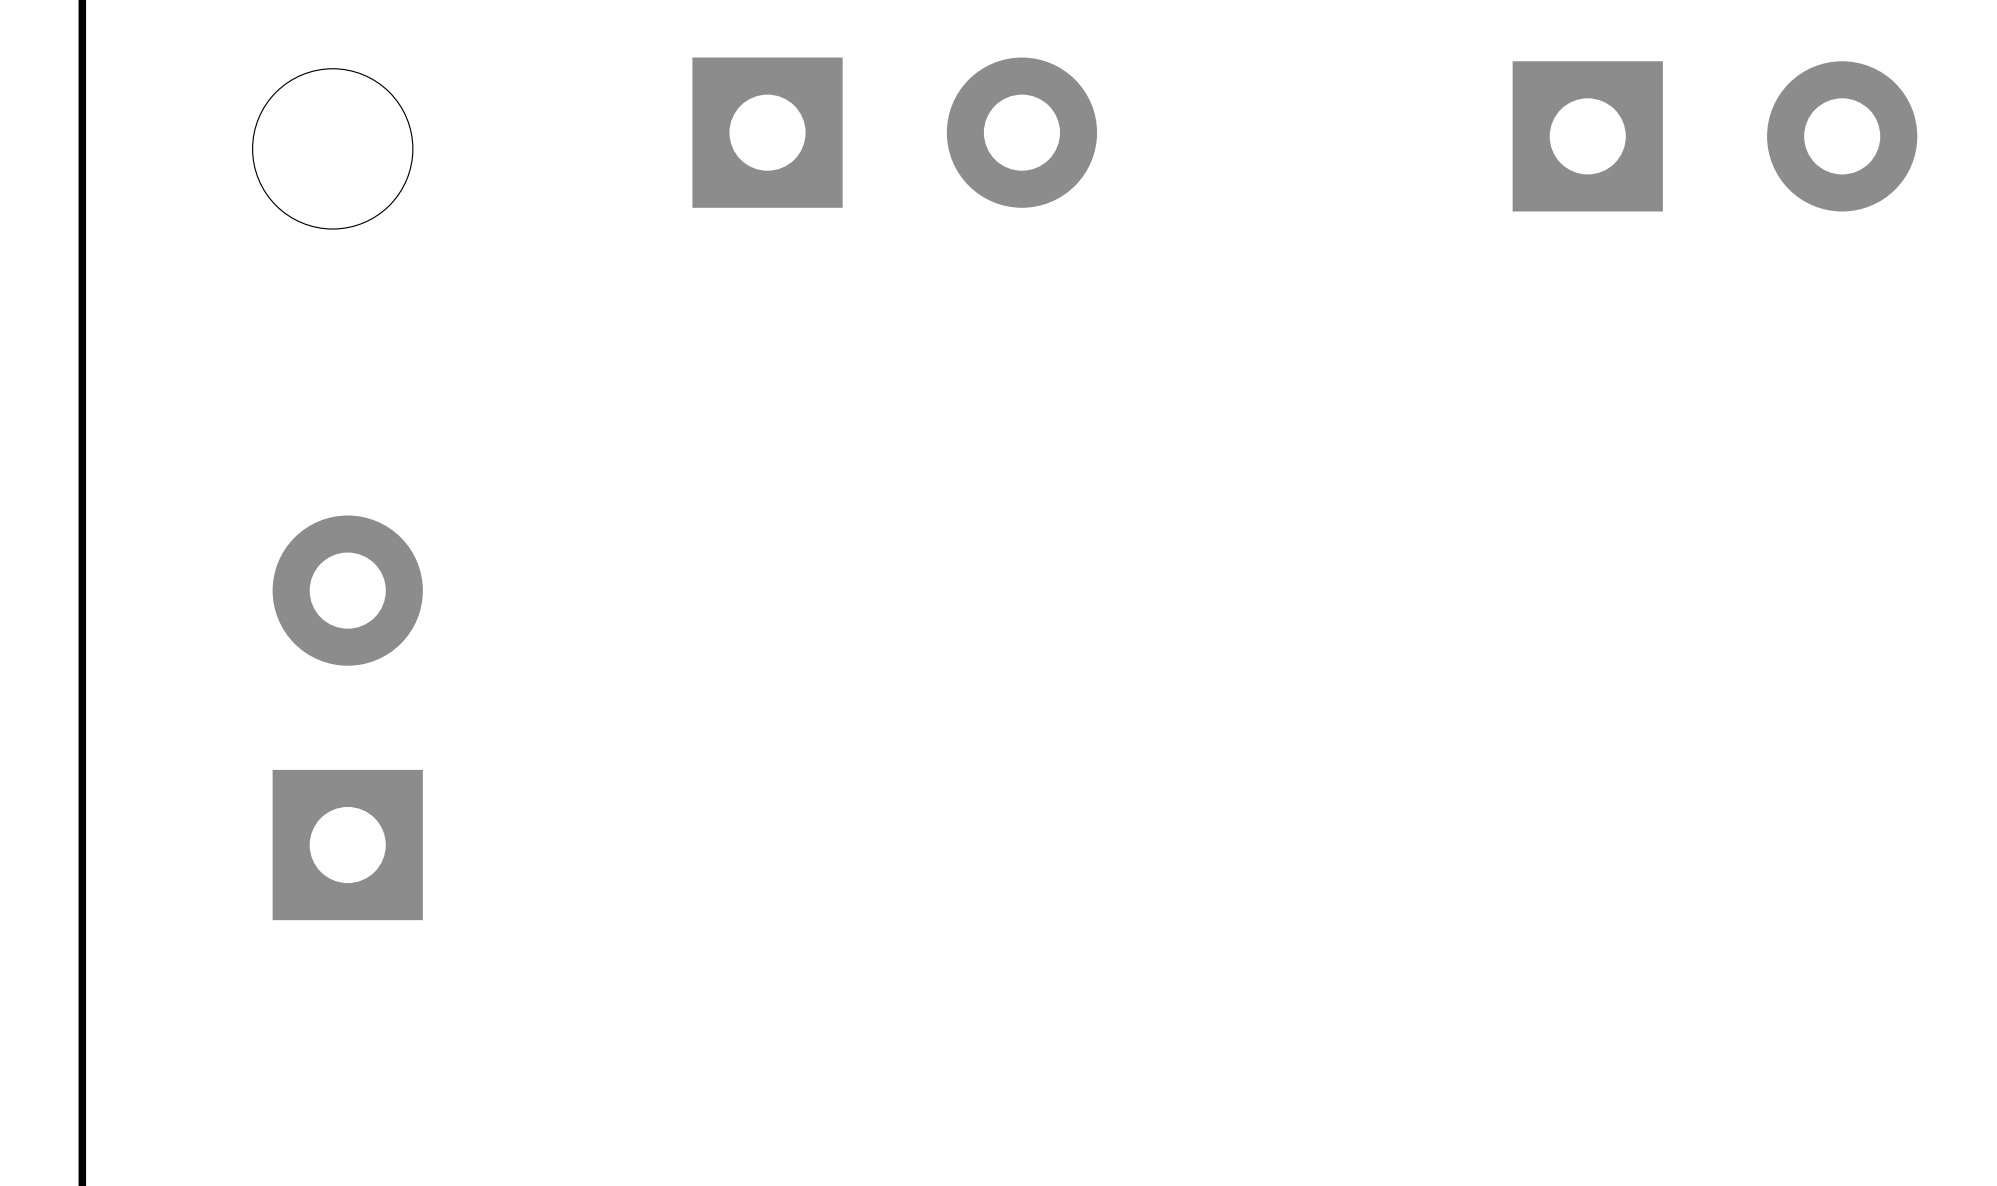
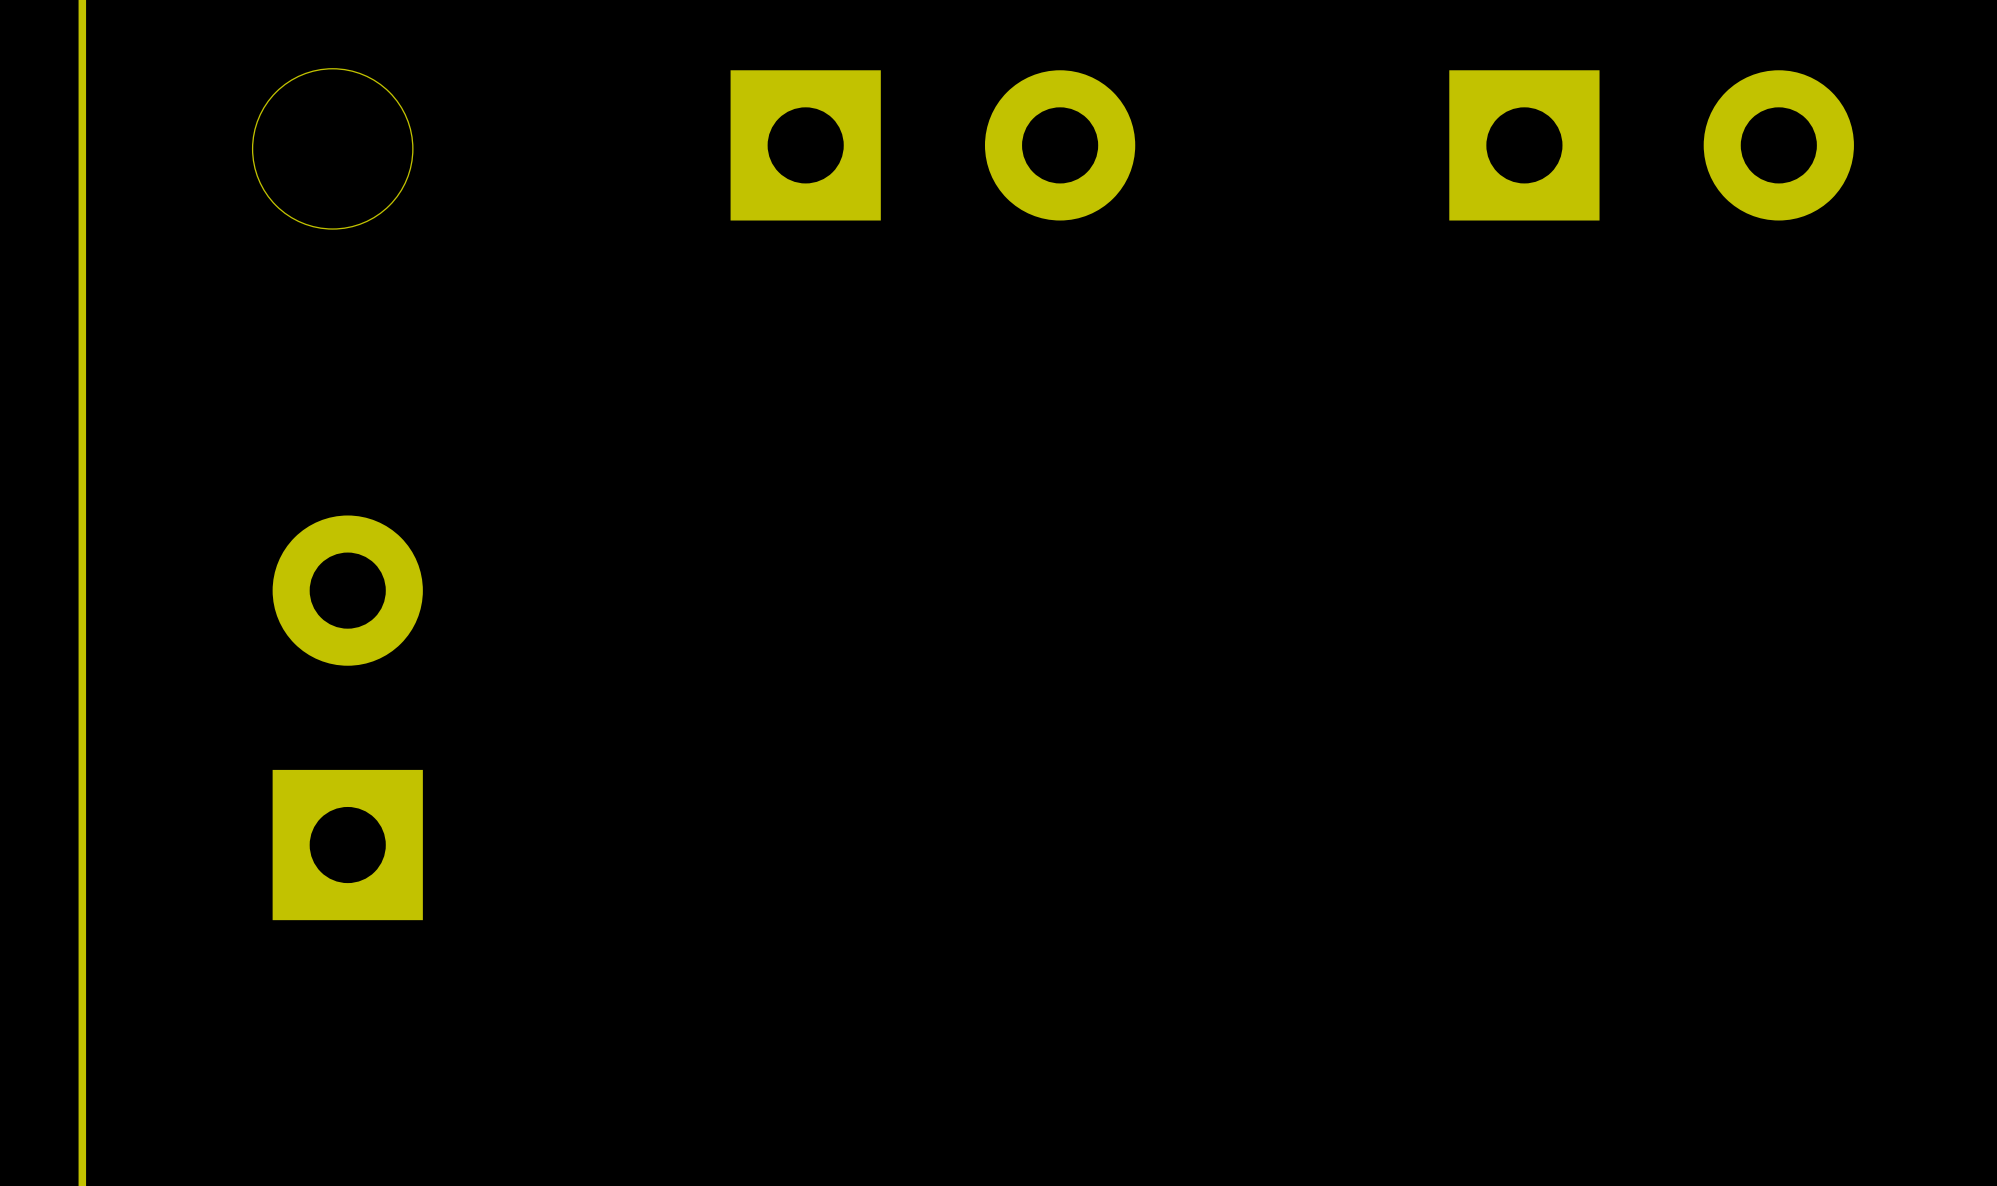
part position: (894, 132) -> (932, 145)
part position: (1714, 136) -> (1651, 145)

